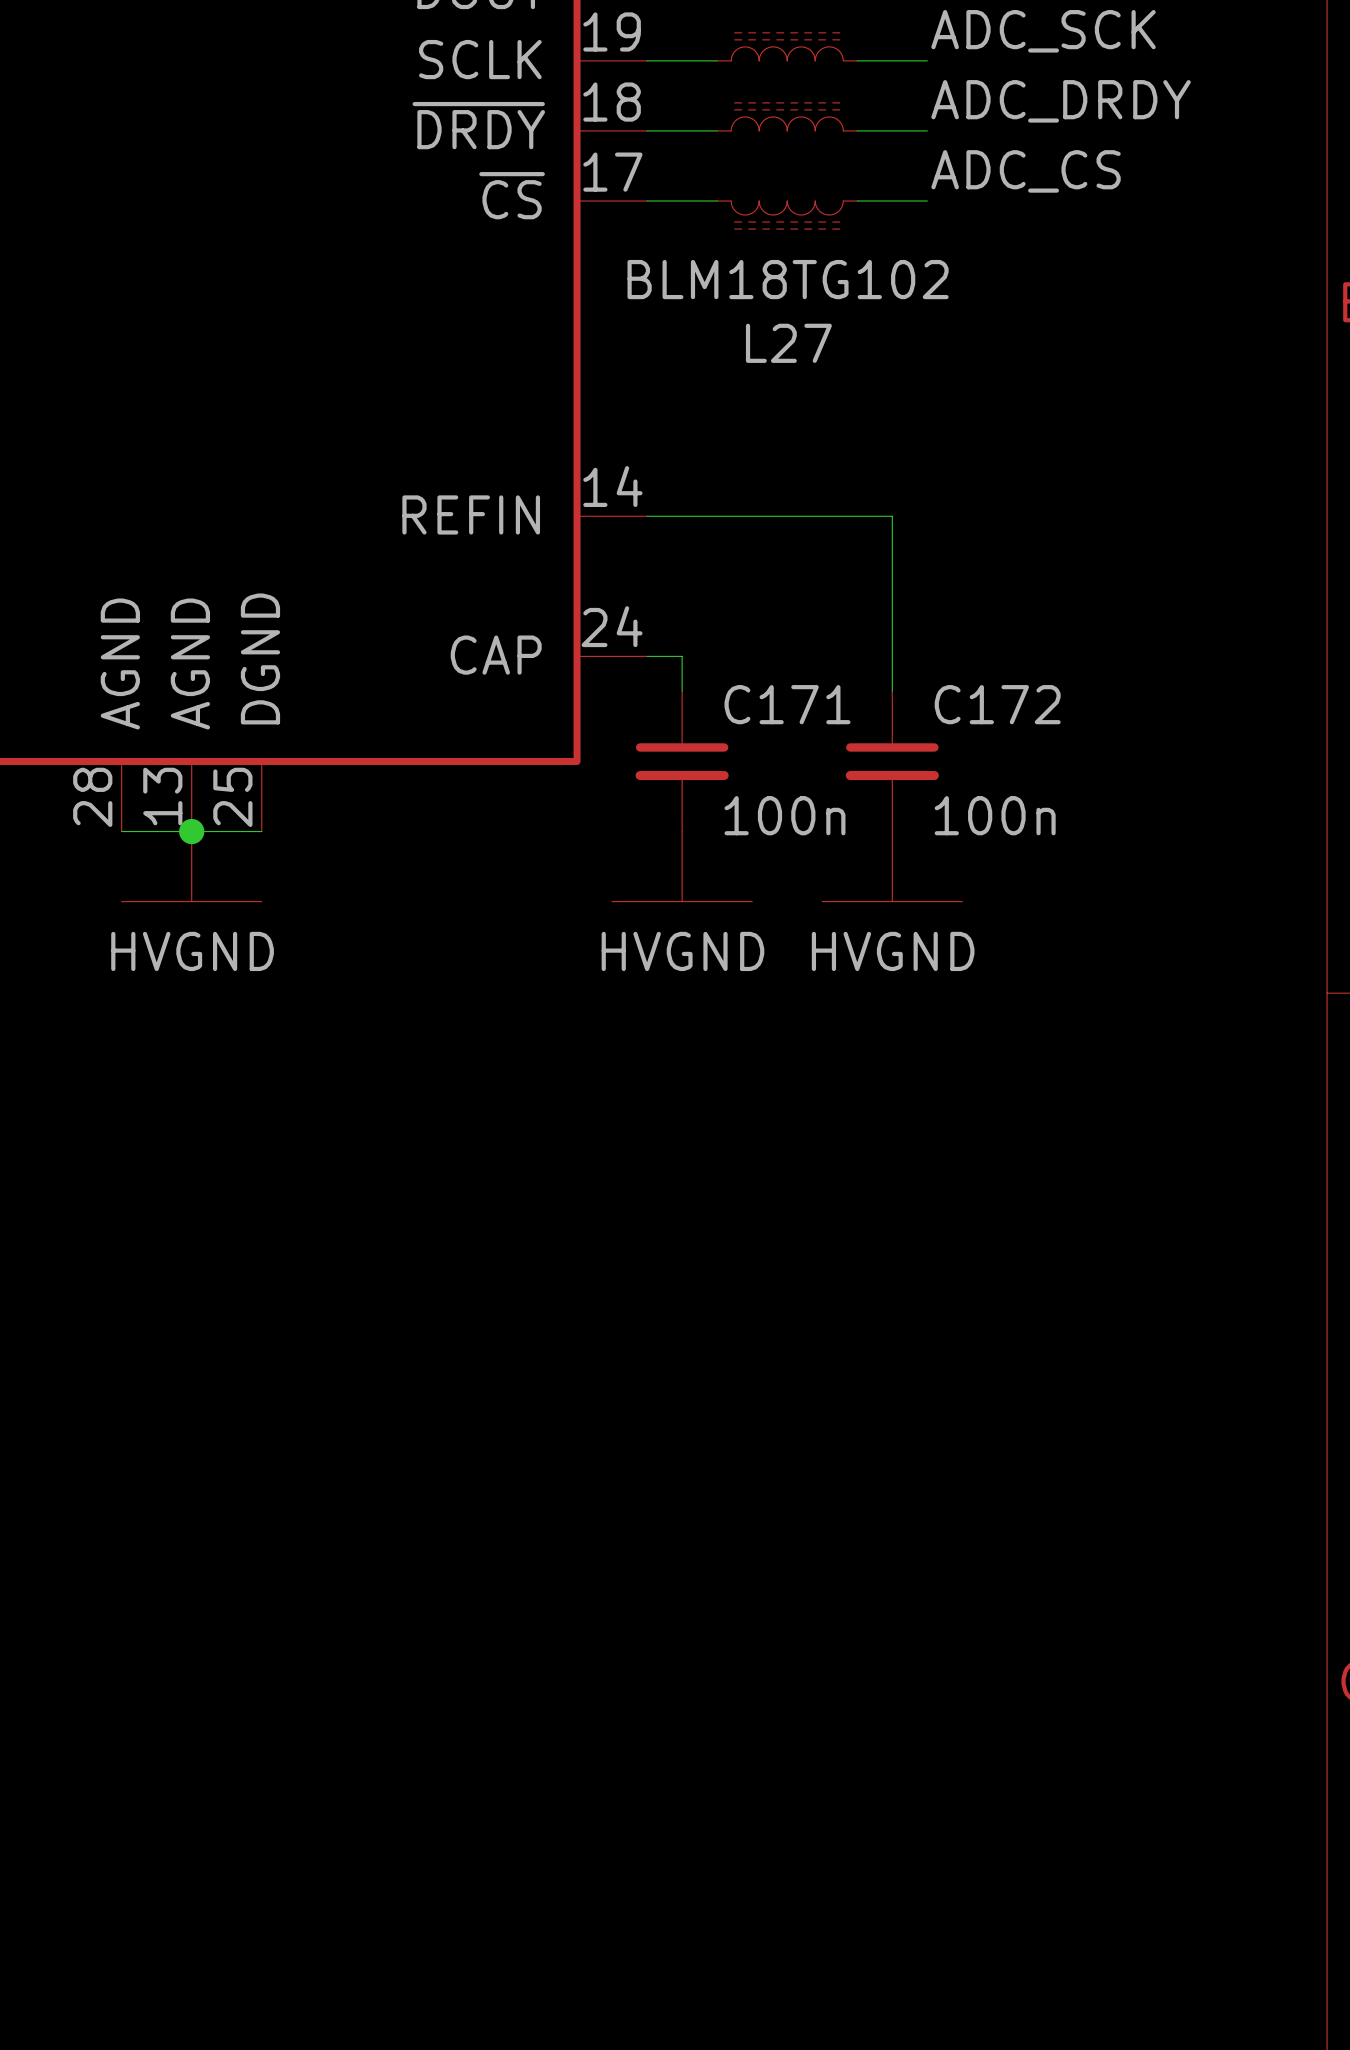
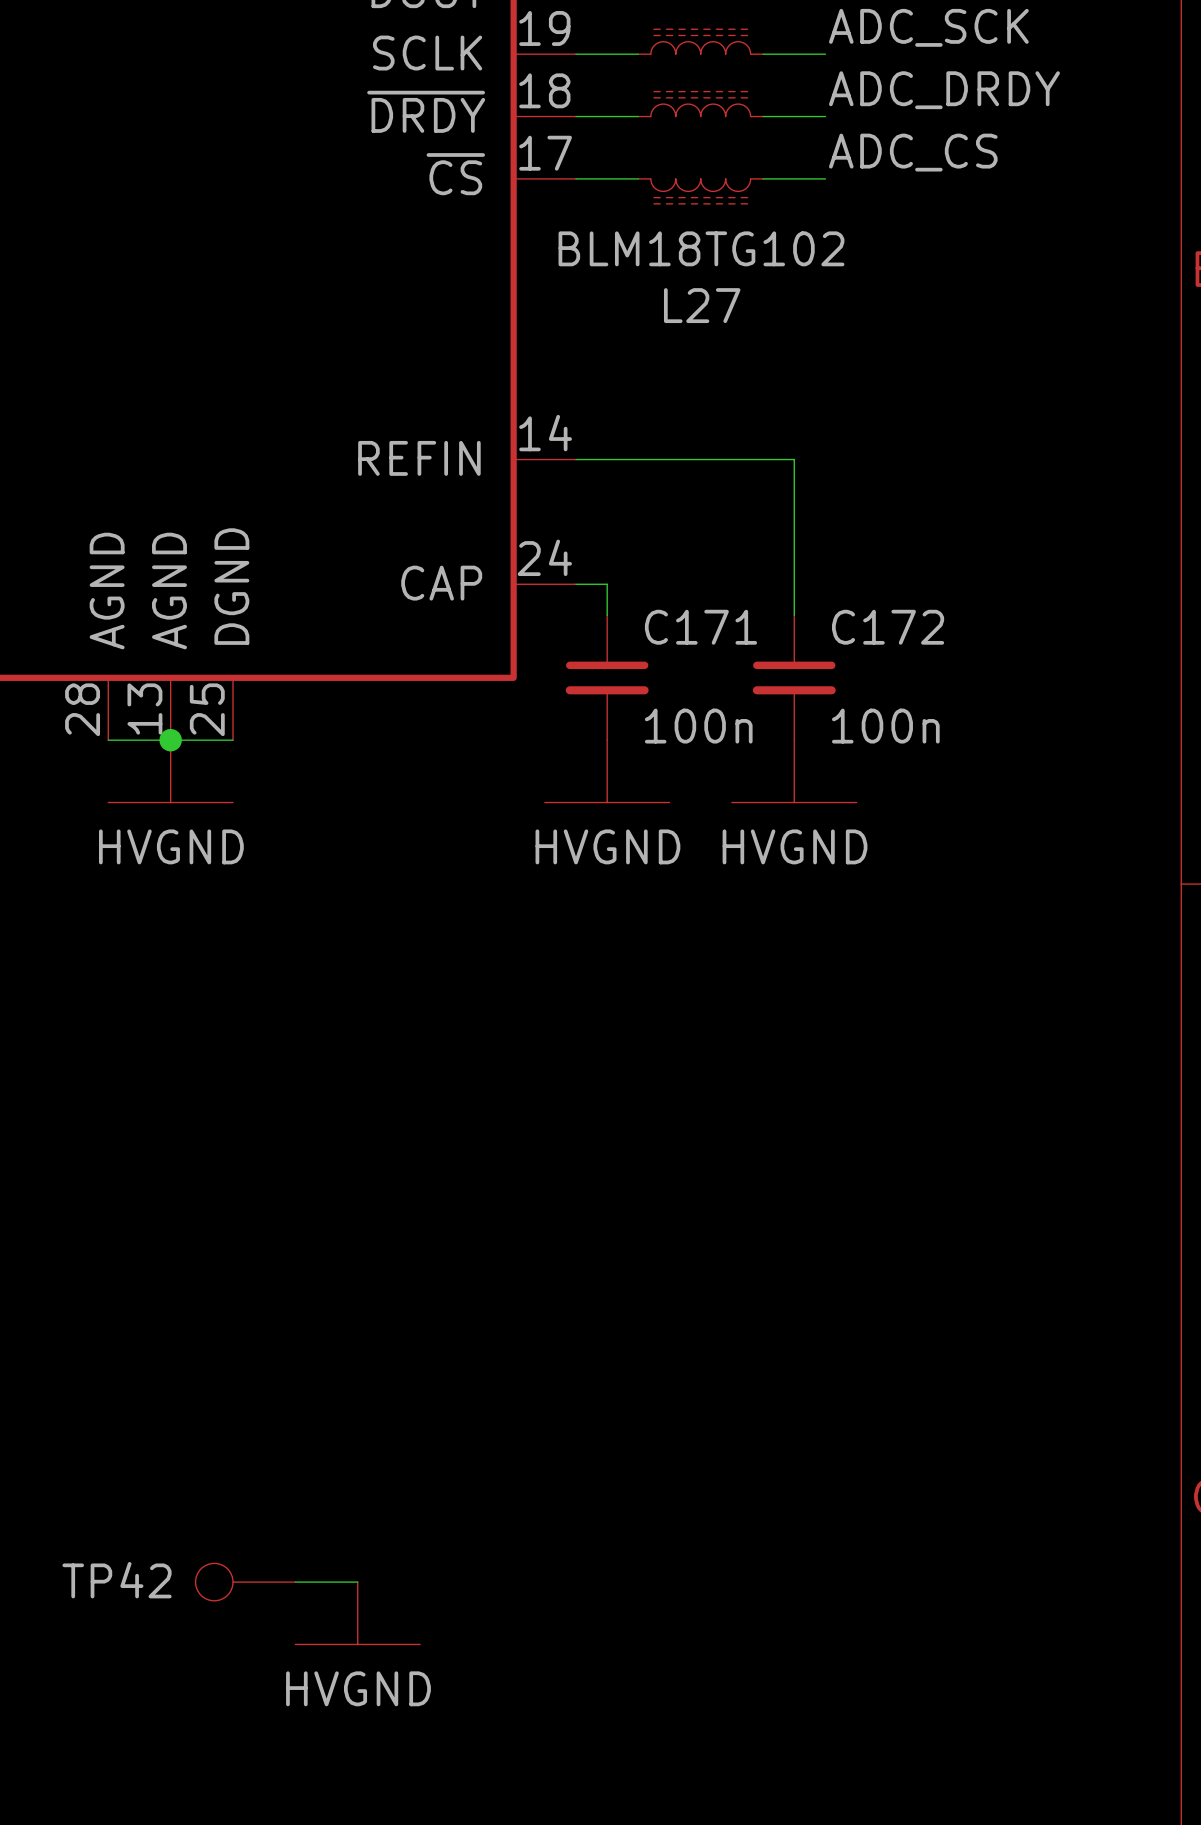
TP42: none -> (245, 1582)
wire: none -> (295, 1582) (357, 1582)
power symbol: none -> HVGND (357, 1613)

